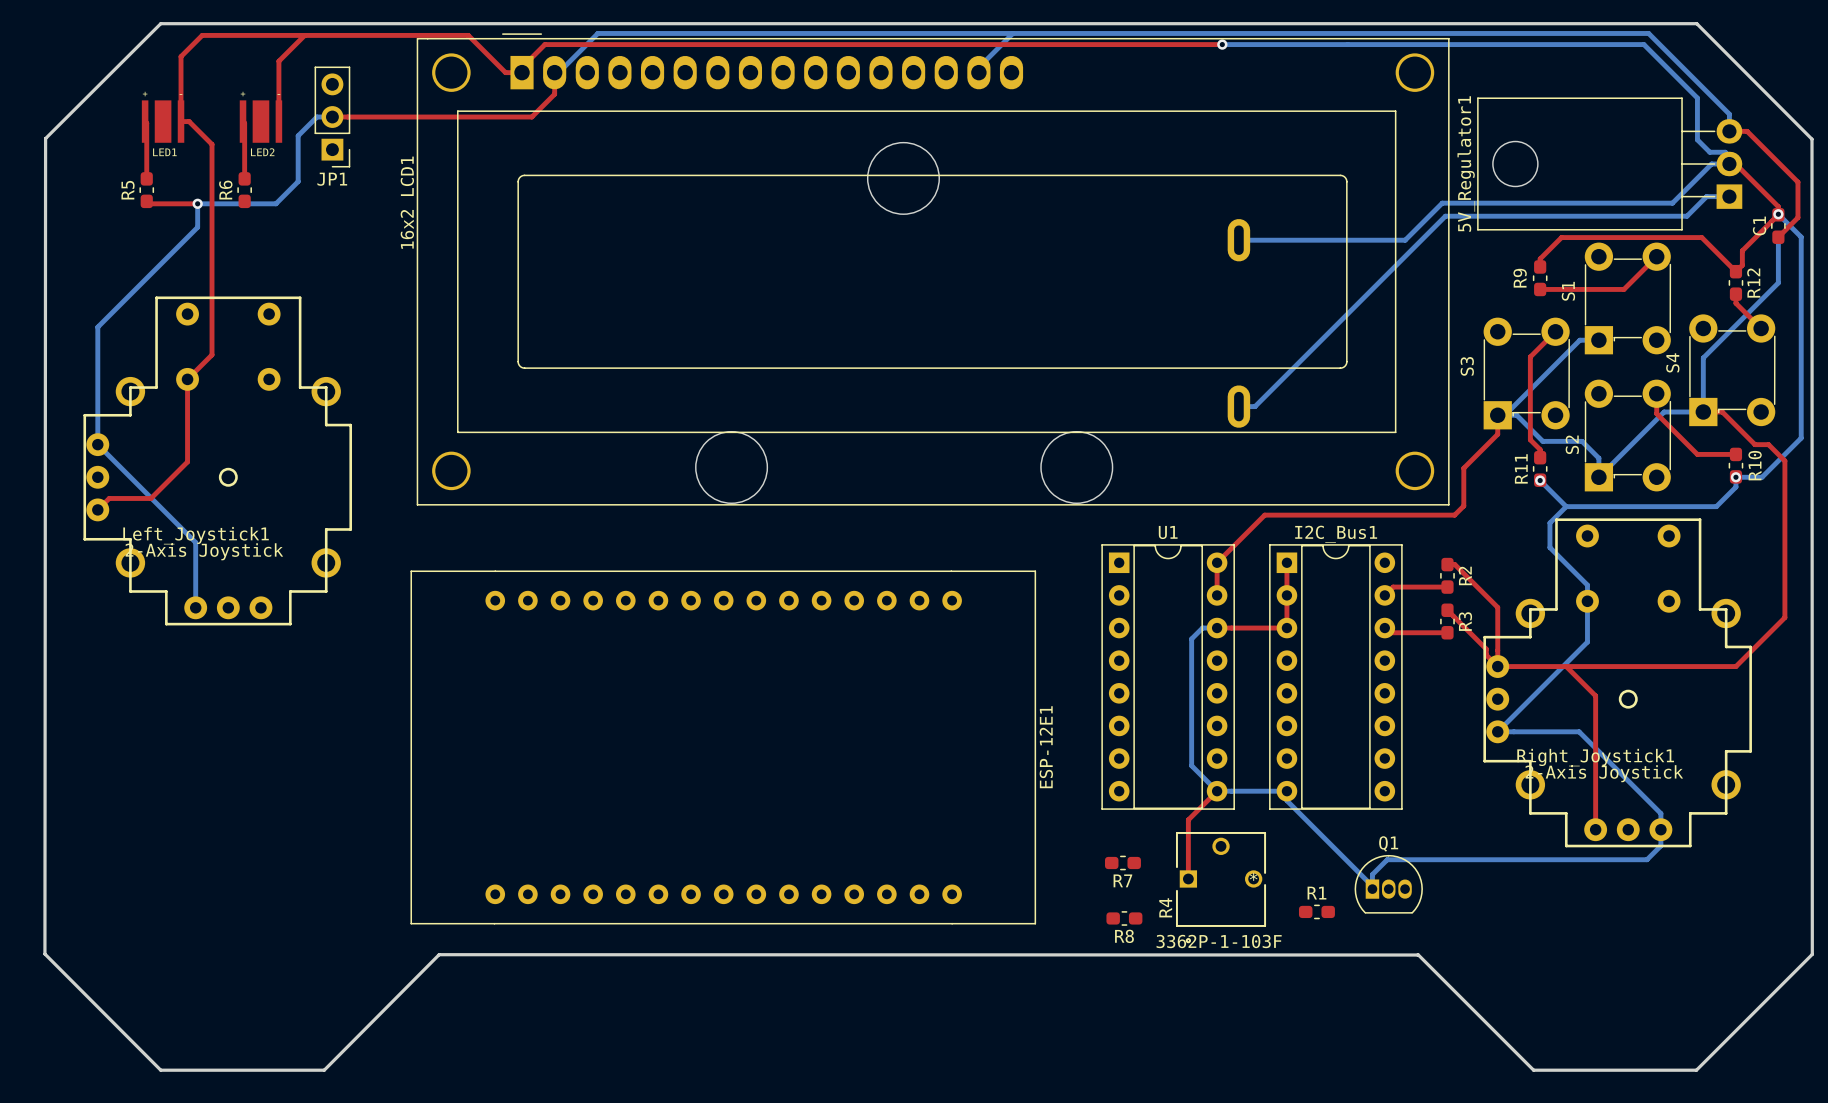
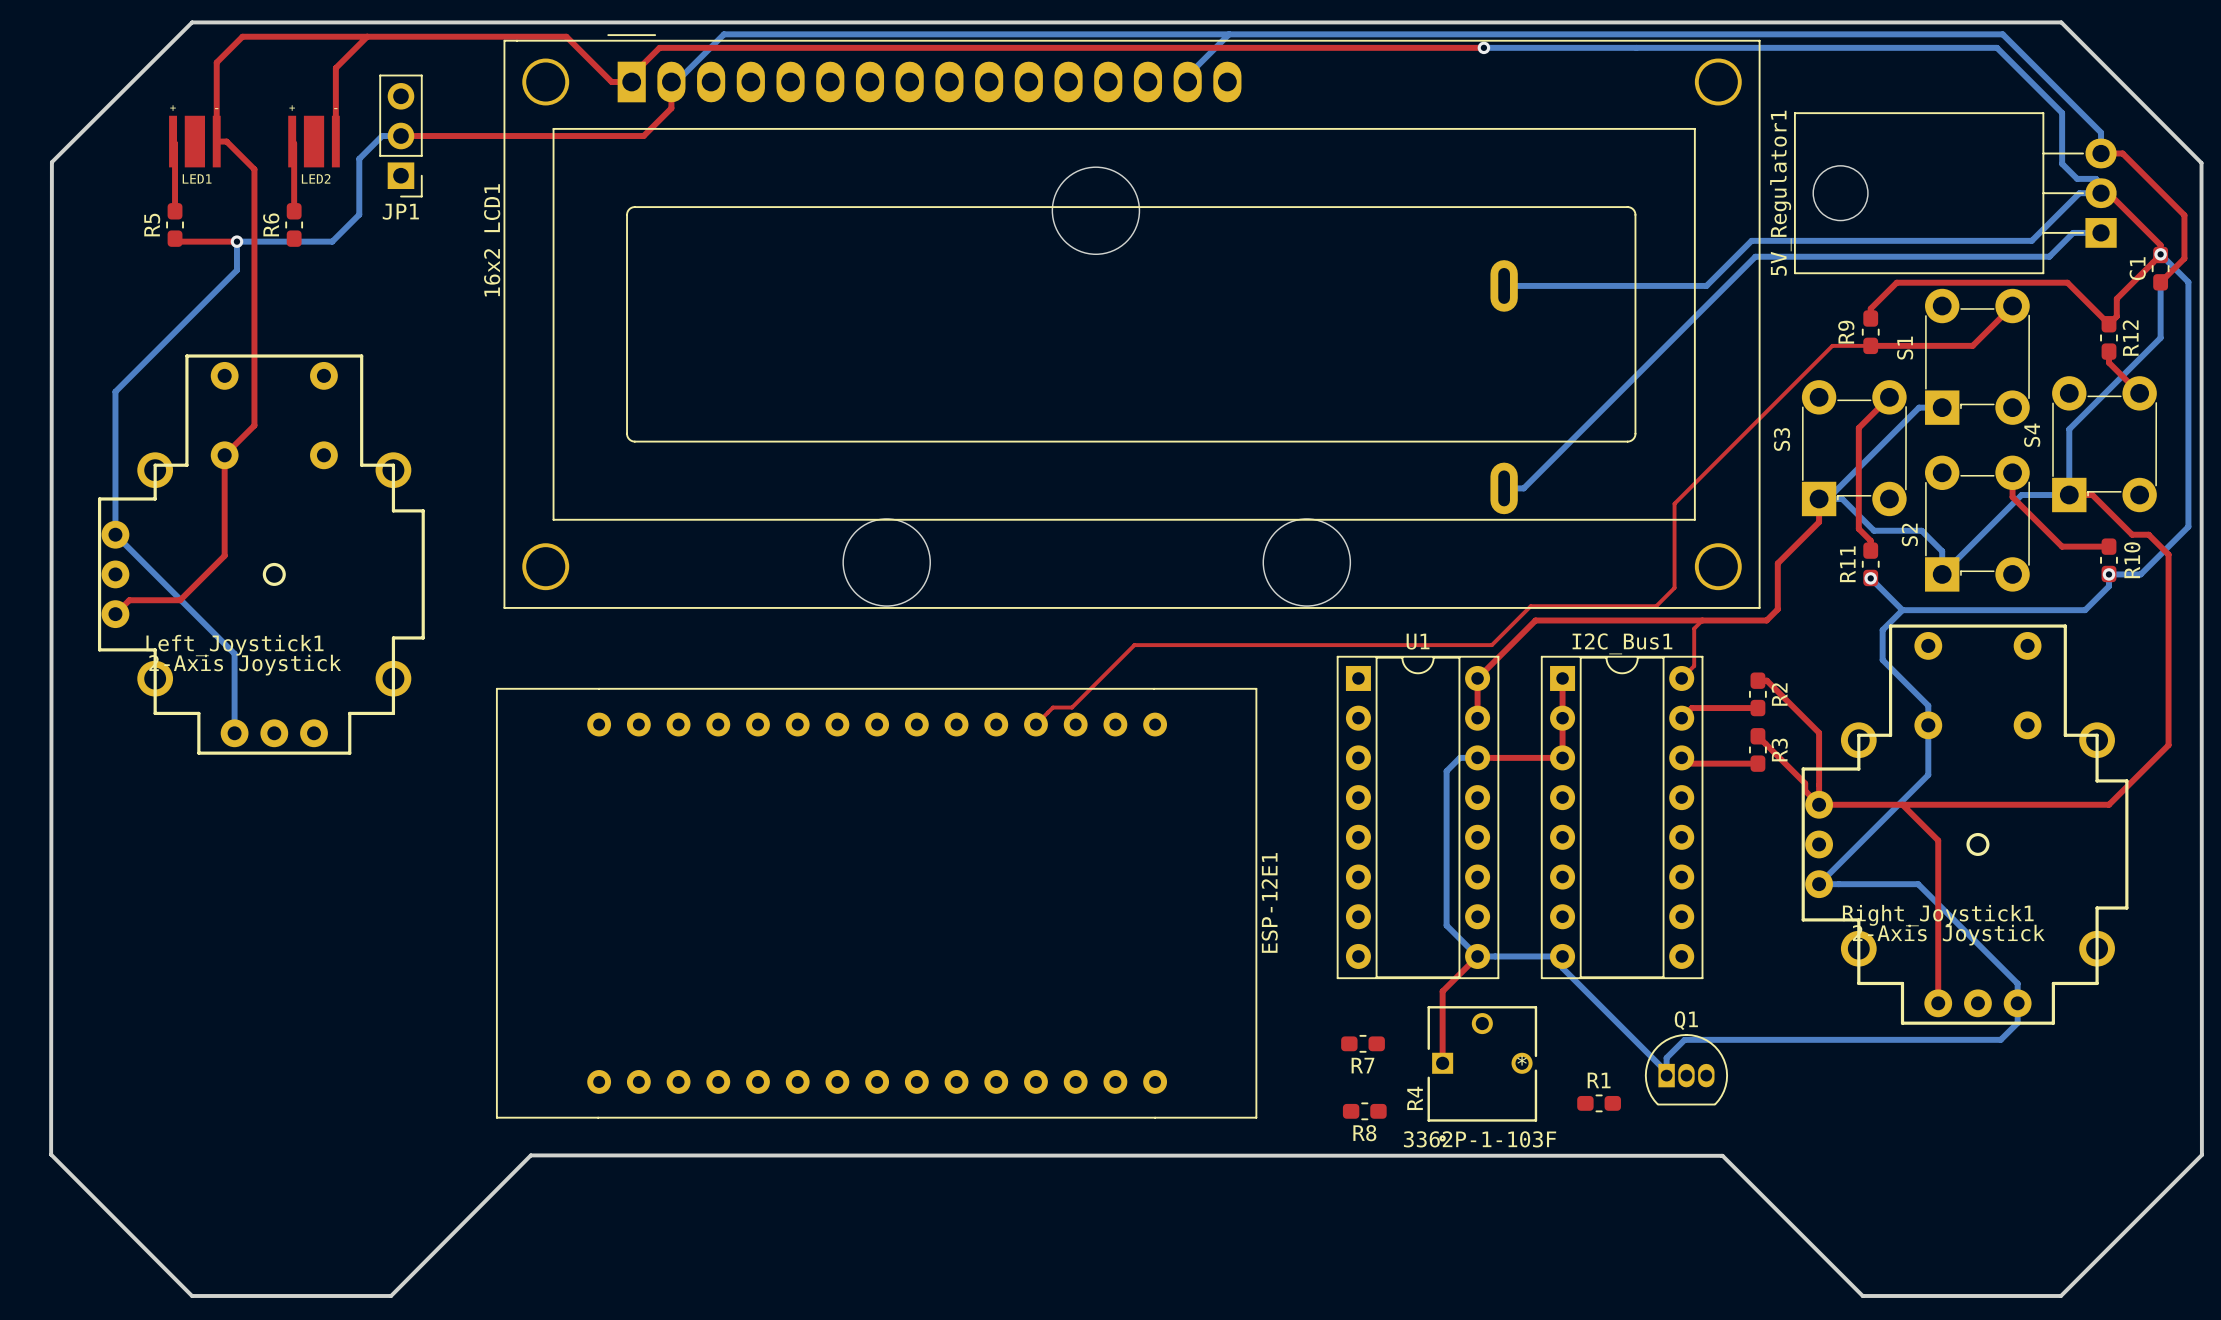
top track: none -> (1870, 345) (1832, 345) (1674, 503) (1674, 587) (1656, 606) (1530, 606) (1491, 645) (1134, 645) (1072, 707) (1052, 707) (1035, 724)
top track: none -> (1702, 620) (1694, 628) (1694, 665) (1681, 678)

